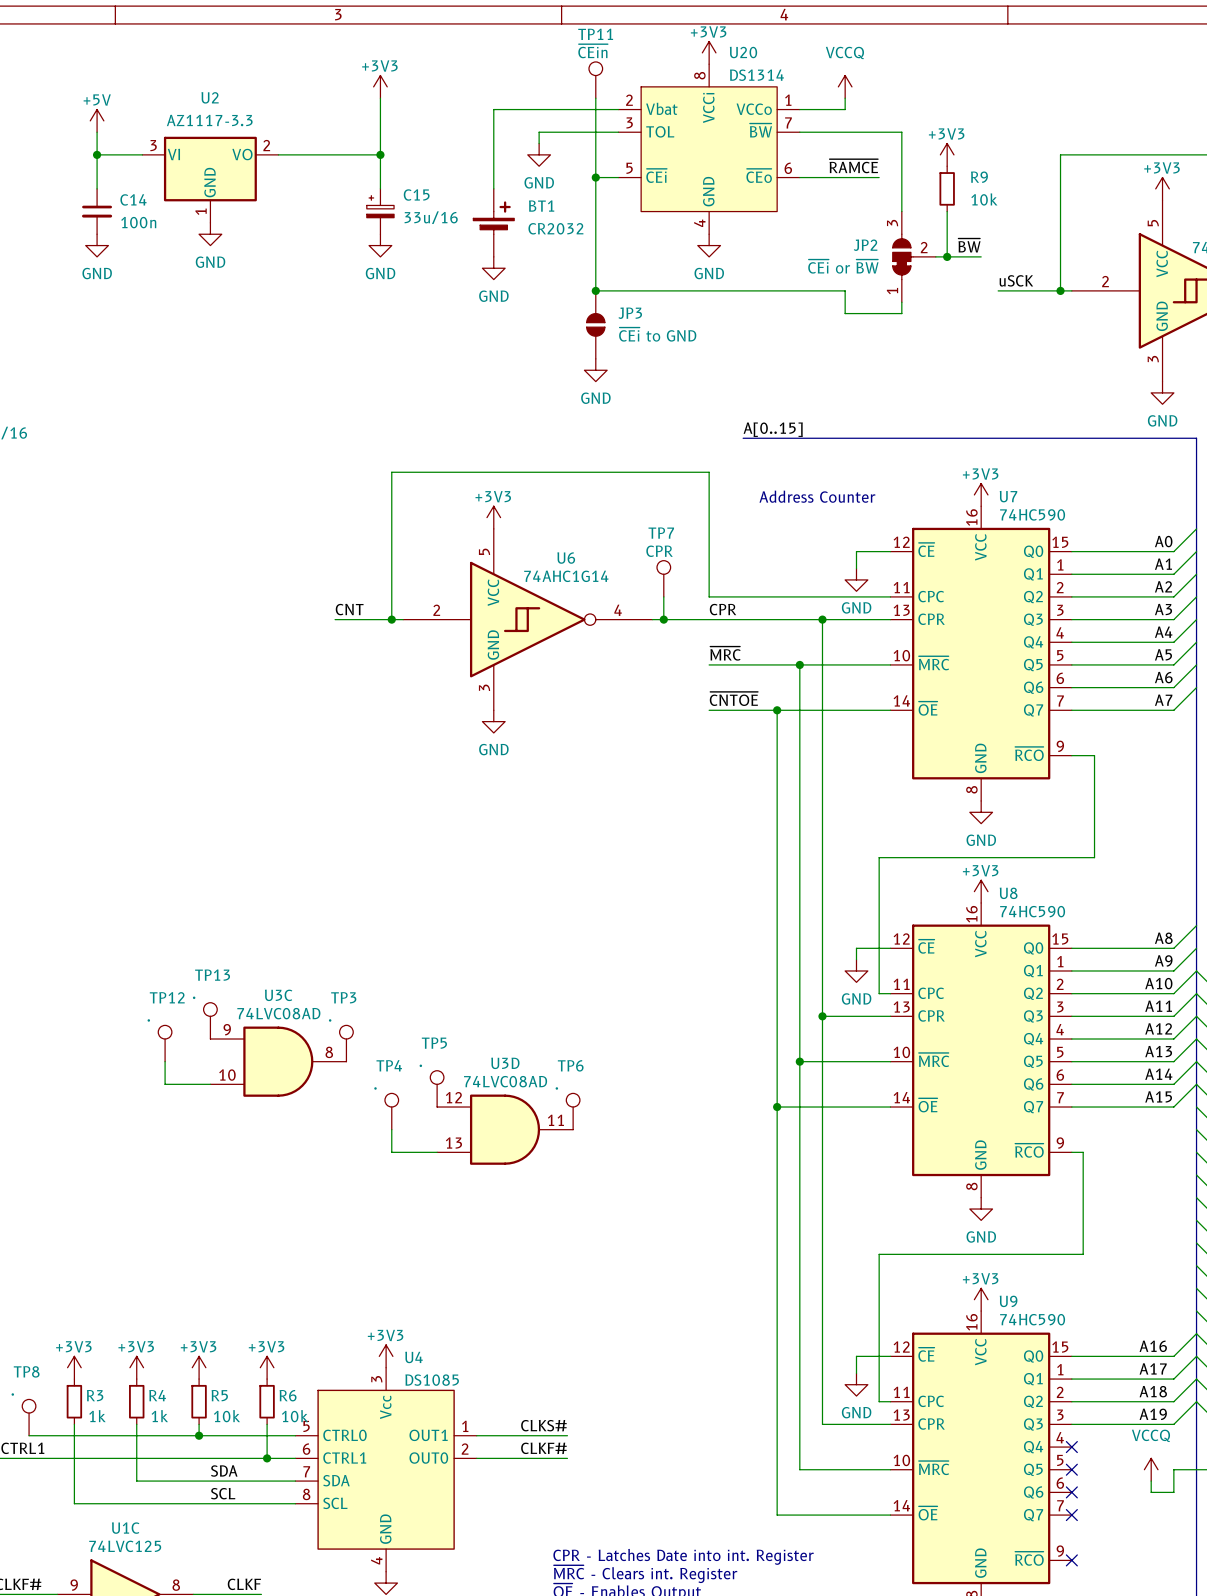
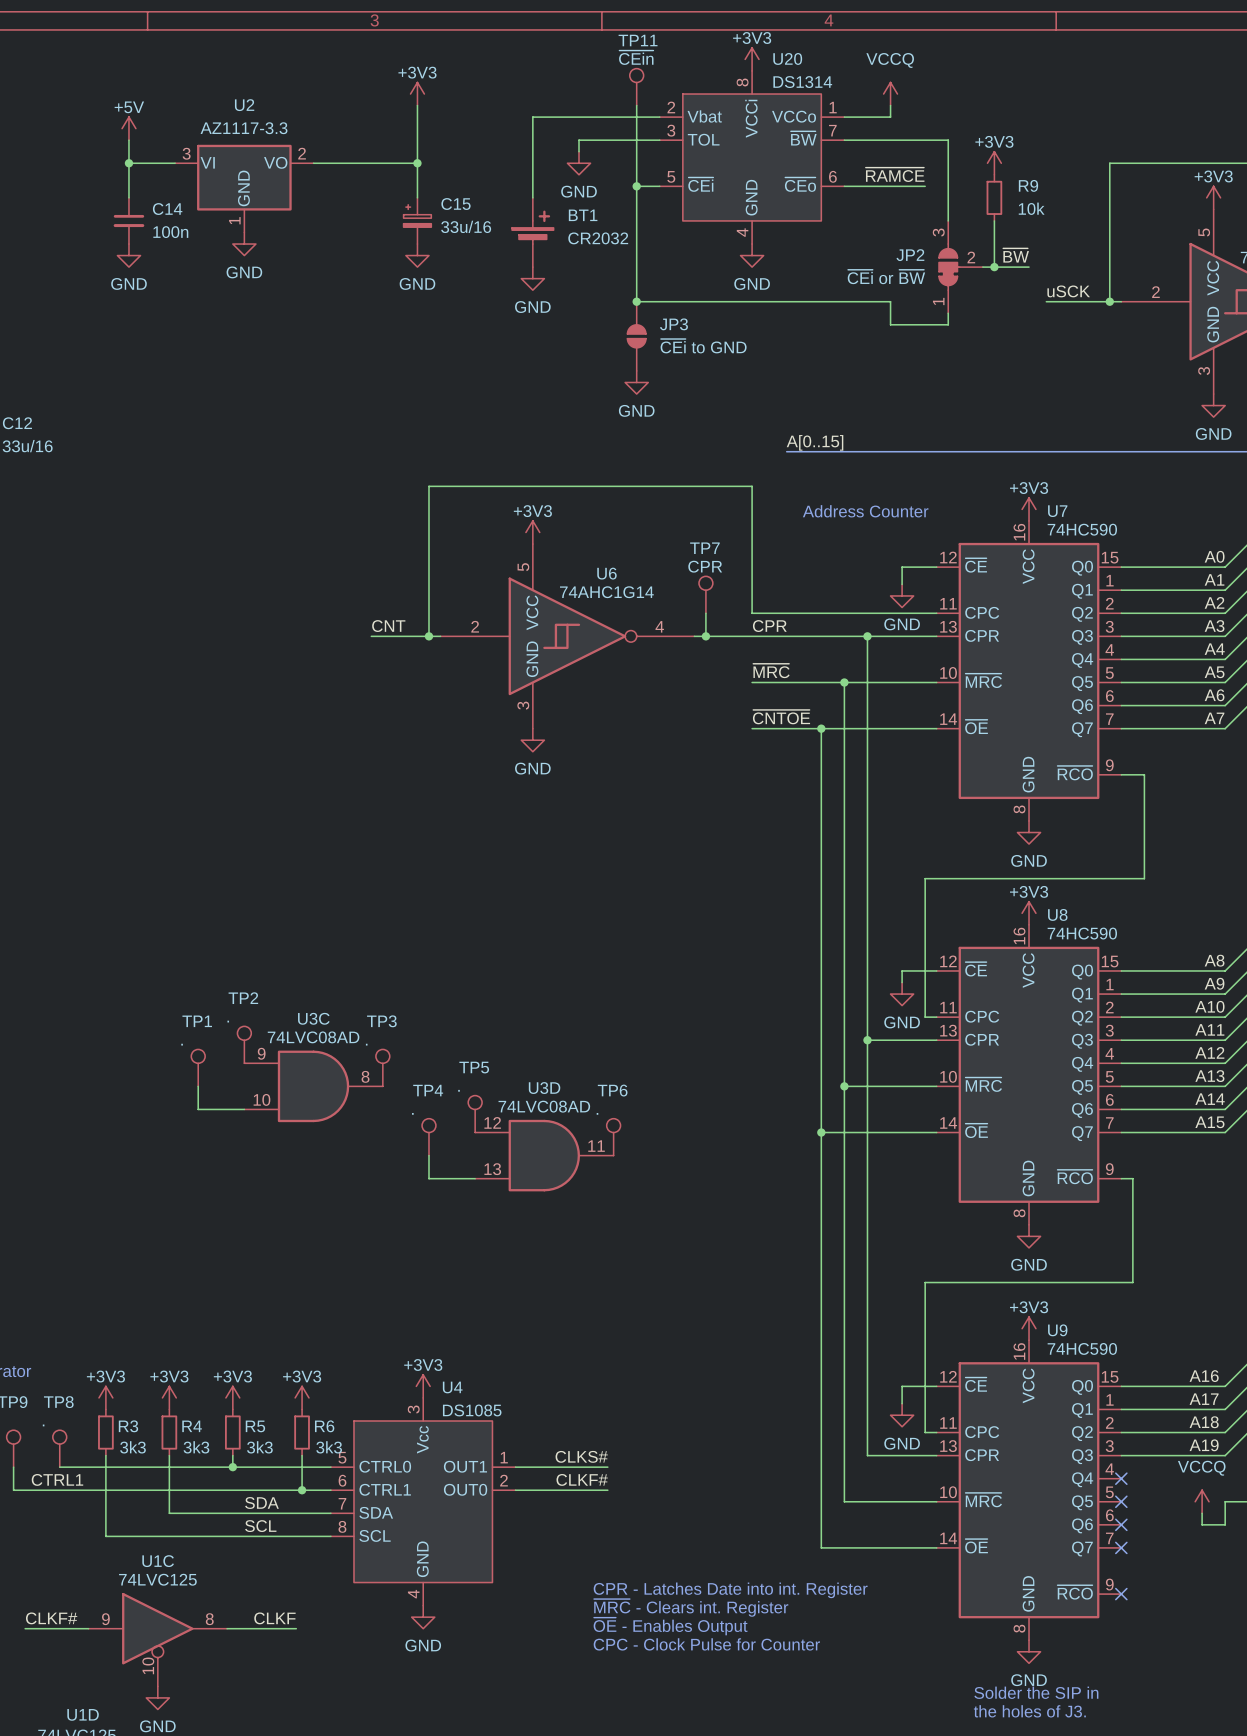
TP13 name: TP13 (212, 975) -> TP2 (243, 998)
TP12 name: TP12 (167, 997) -> TP1 (197, 1021)
R3 value: 1k (97, 1416) -> 3k3 (132, 1447)
R4 value: 1k (159, 1416) -> 3k3 (196, 1447)
R5 value: 10k (226, 1416) -> 3k3 (259, 1447)
R6 value: 10k (294, 1416) -> 3k3 (329, 1447)

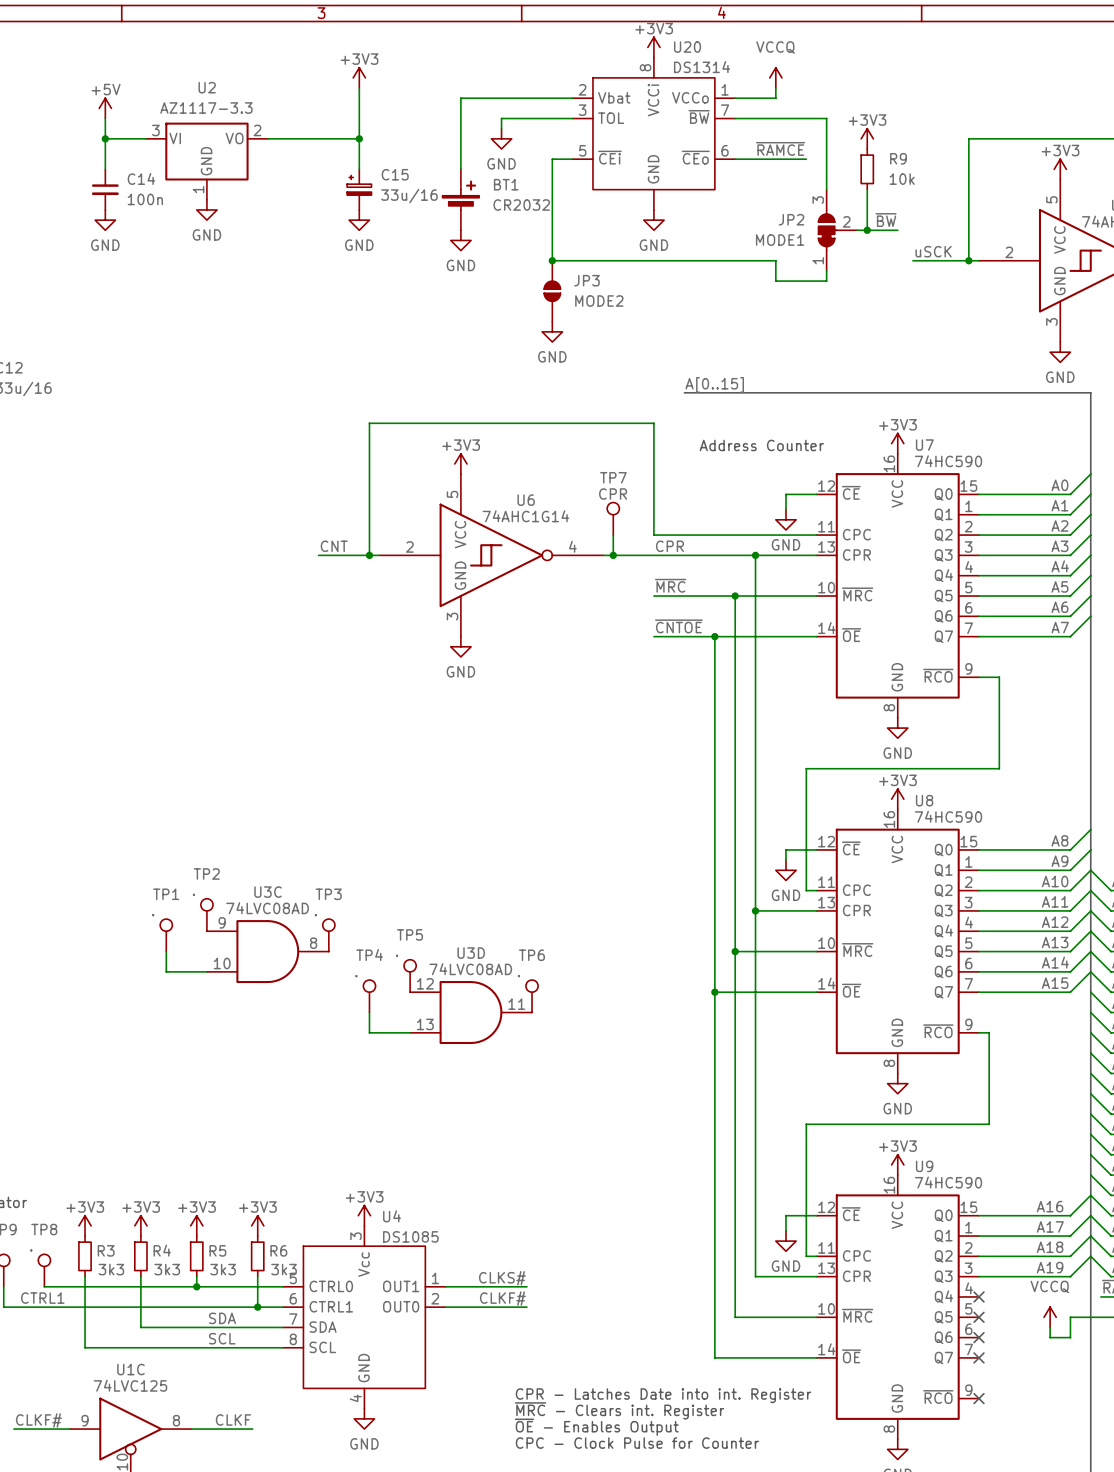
TP11: ~{CEin} (636, 87) -> none
wire: (636, 105) (636, 186) -> none
junction: (636, 186) -> none
U20 pin number: 4 (742, 232) -> none
JP2 value: ~{CEi} or ~{BW} (886, 276) -> MODE1 (780, 240)
JP3 value: ~{CEi} to GND (703, 346) -> MODE2 (599, 301)

